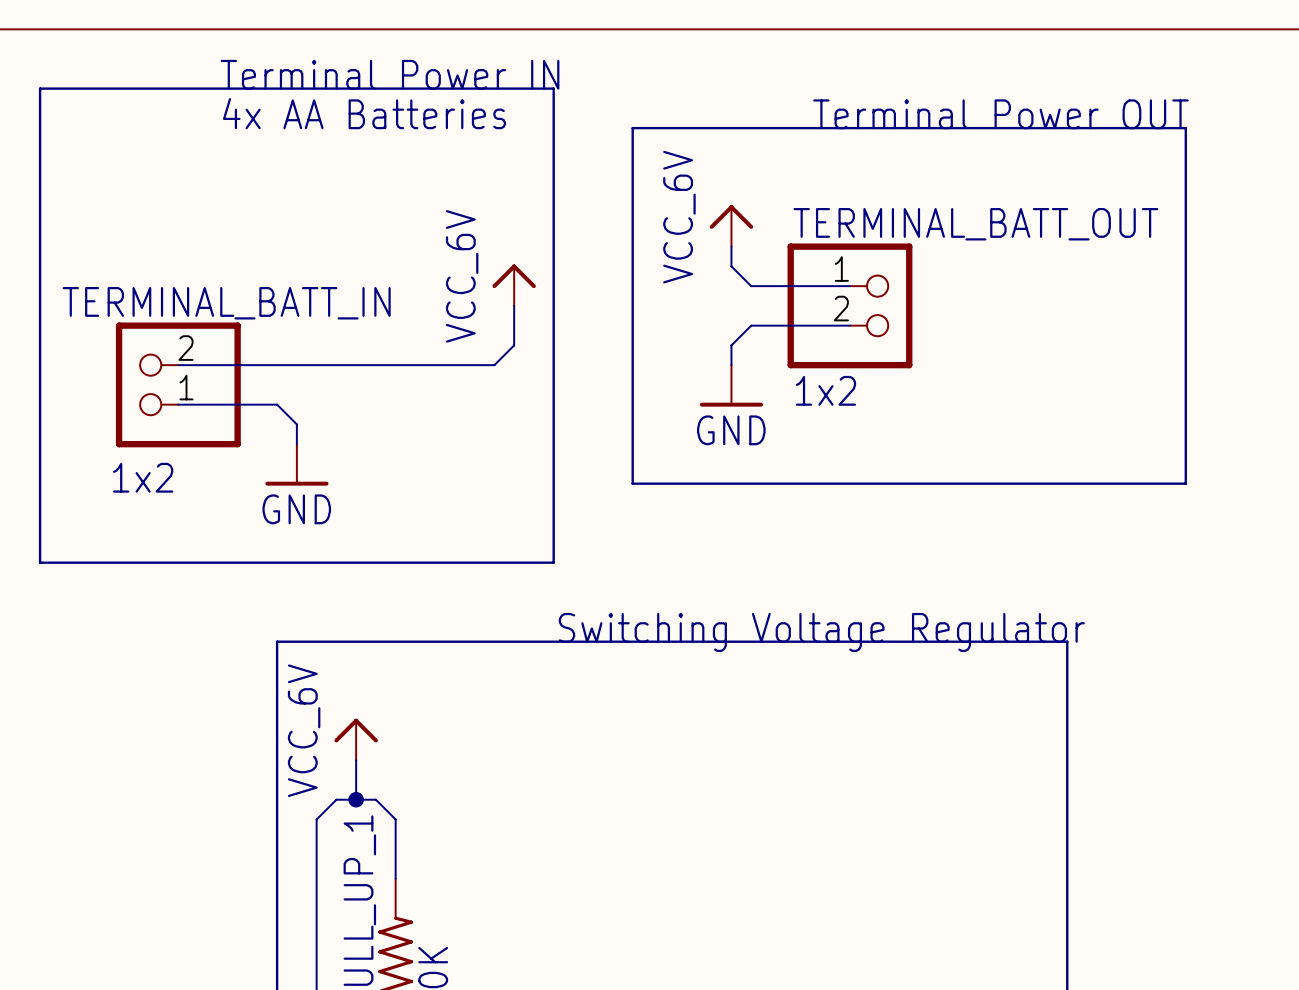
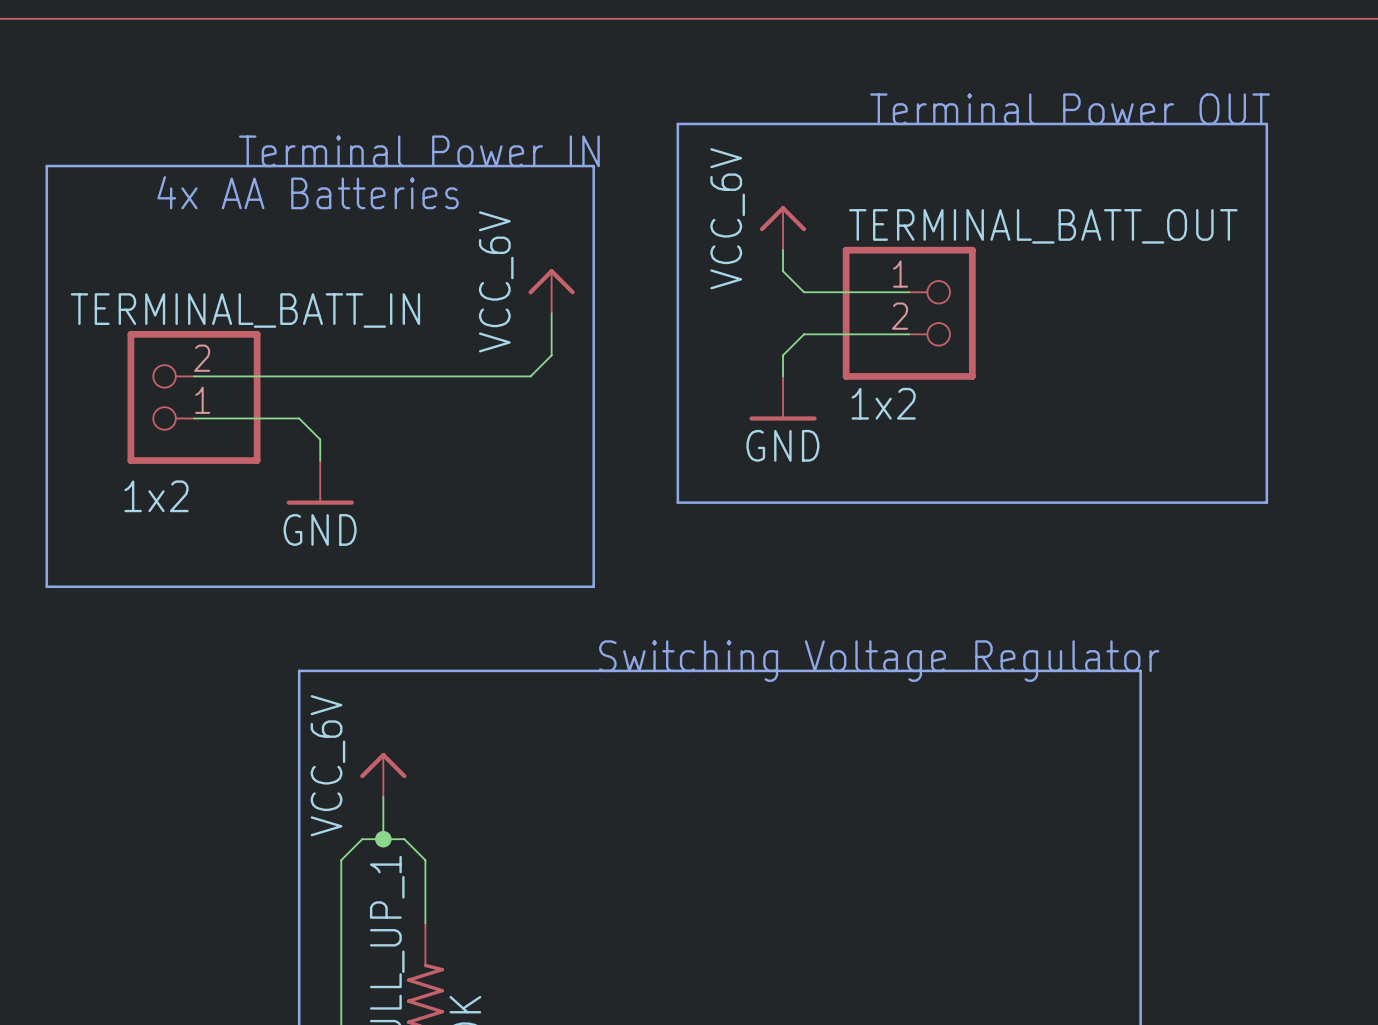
text position: Terminal Power IN (389, 74) -> Terminal Power IN (419, 151)
text position: 4x AA Batteries (364, 113) -> 4x AA Batteries (308, 192)
line: (40, 167) (40, 88) (553, 88) (553, 167) -> (46, 166) (593, 166)

